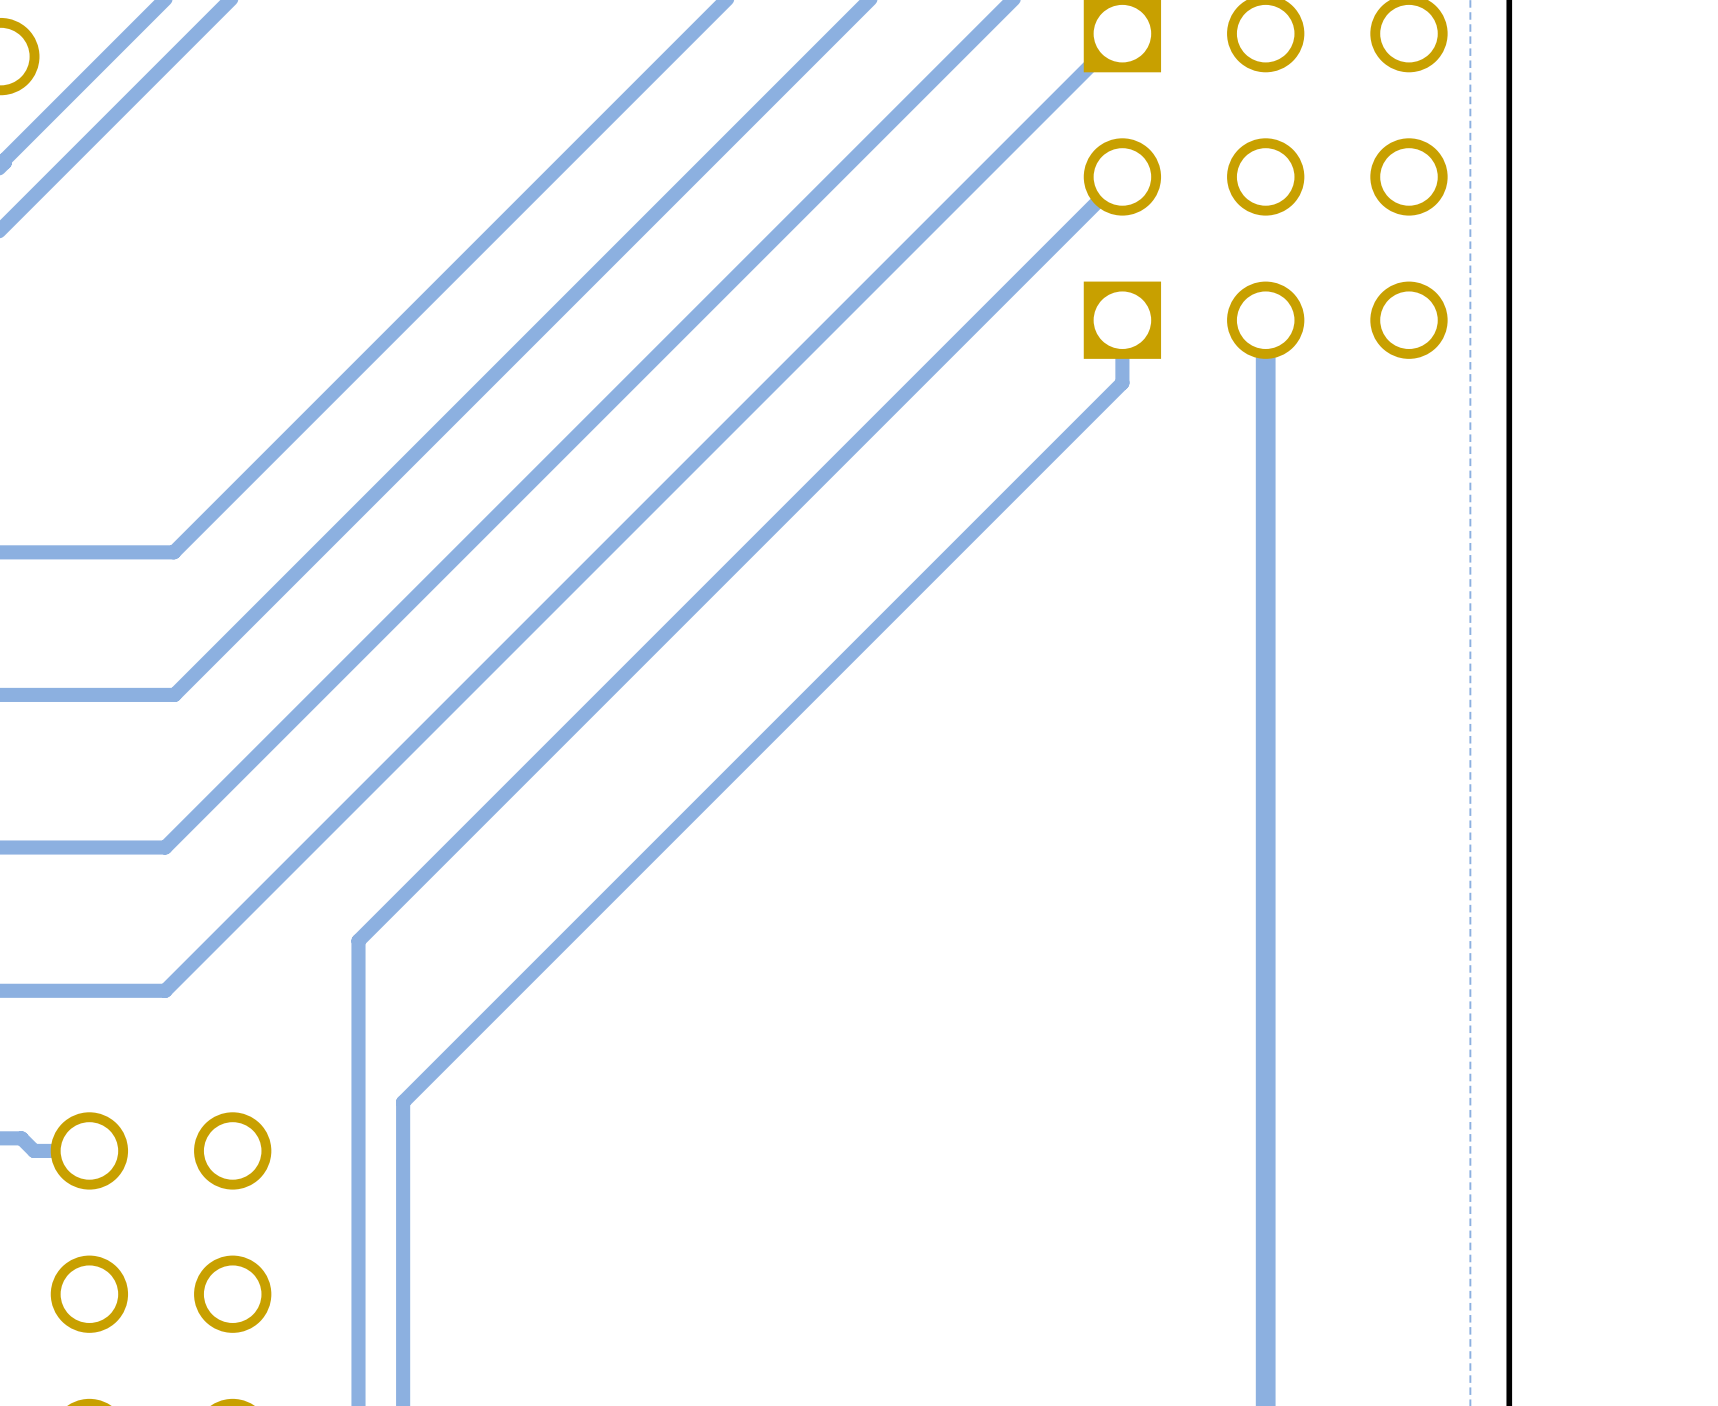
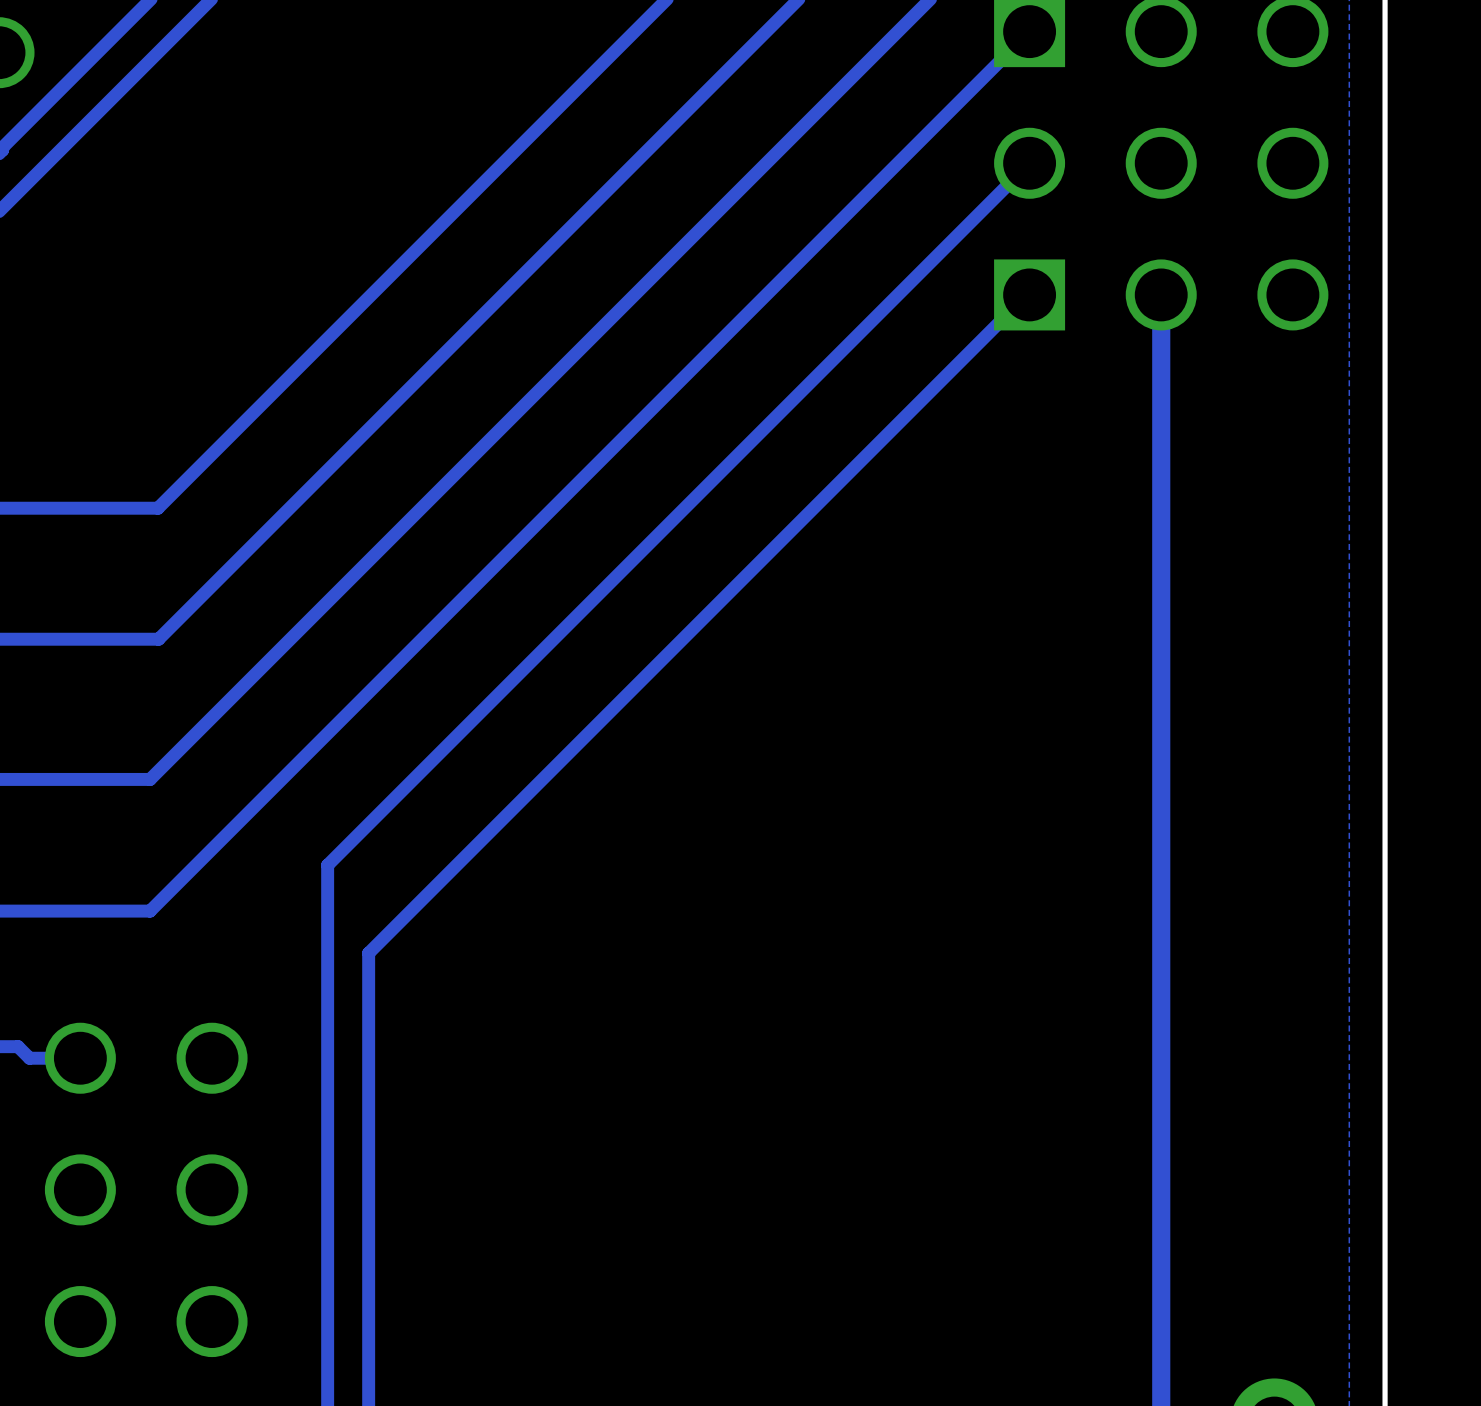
track: (1122, 320) (1122, 382) (403, 1102) -> (1029, 294) (1026, 294) (368, 953) (368, 1013)

